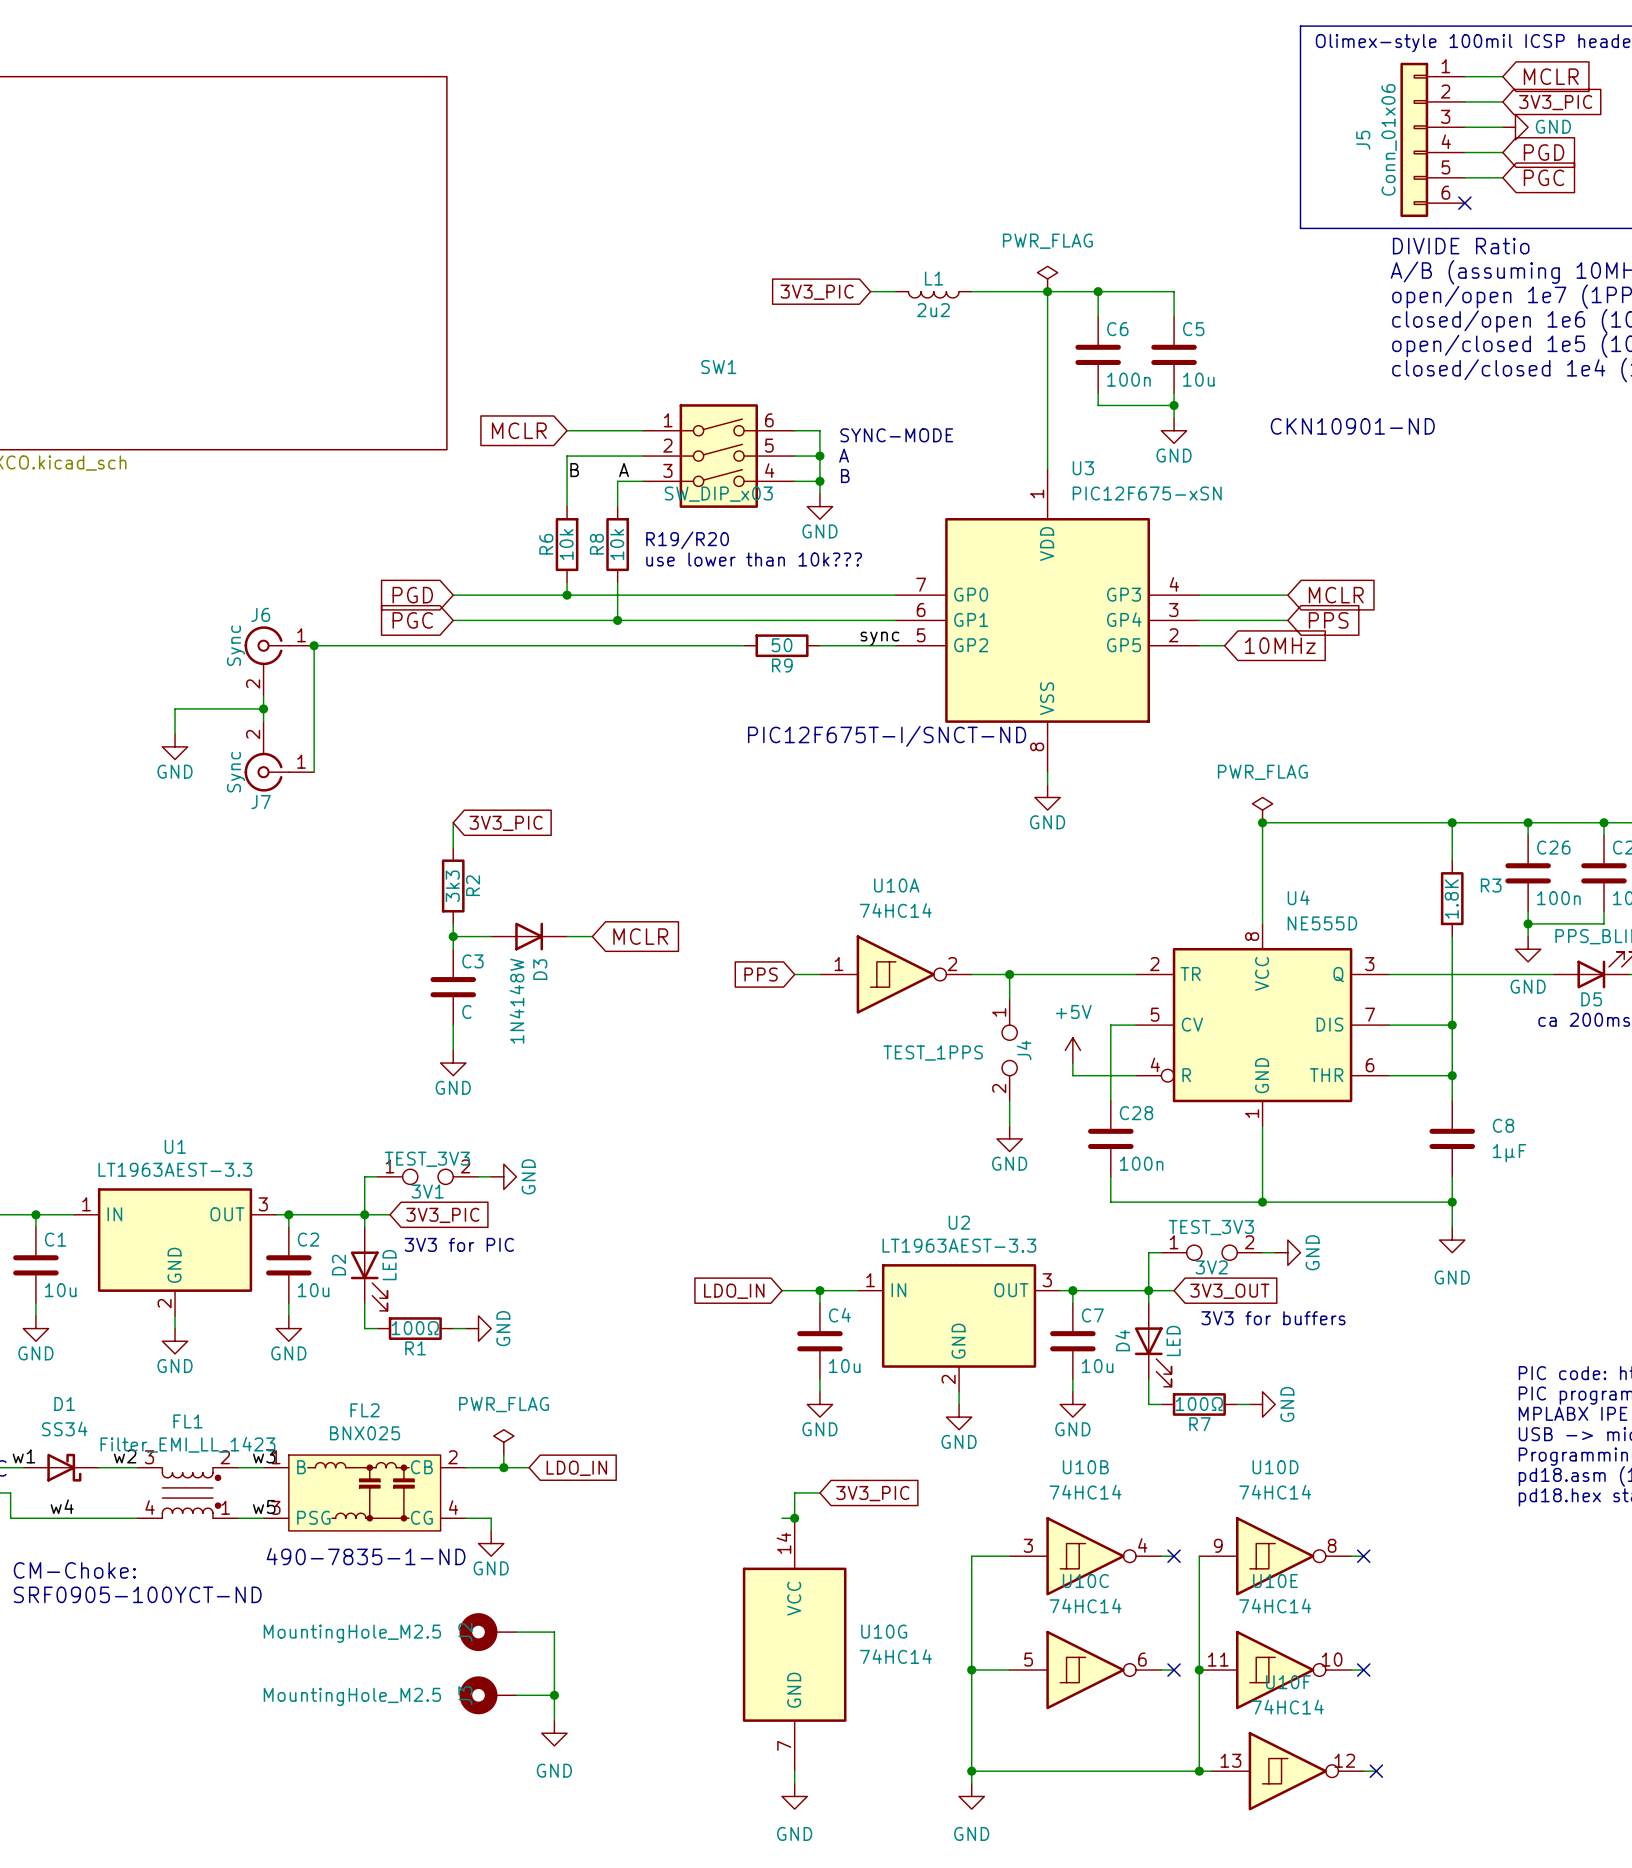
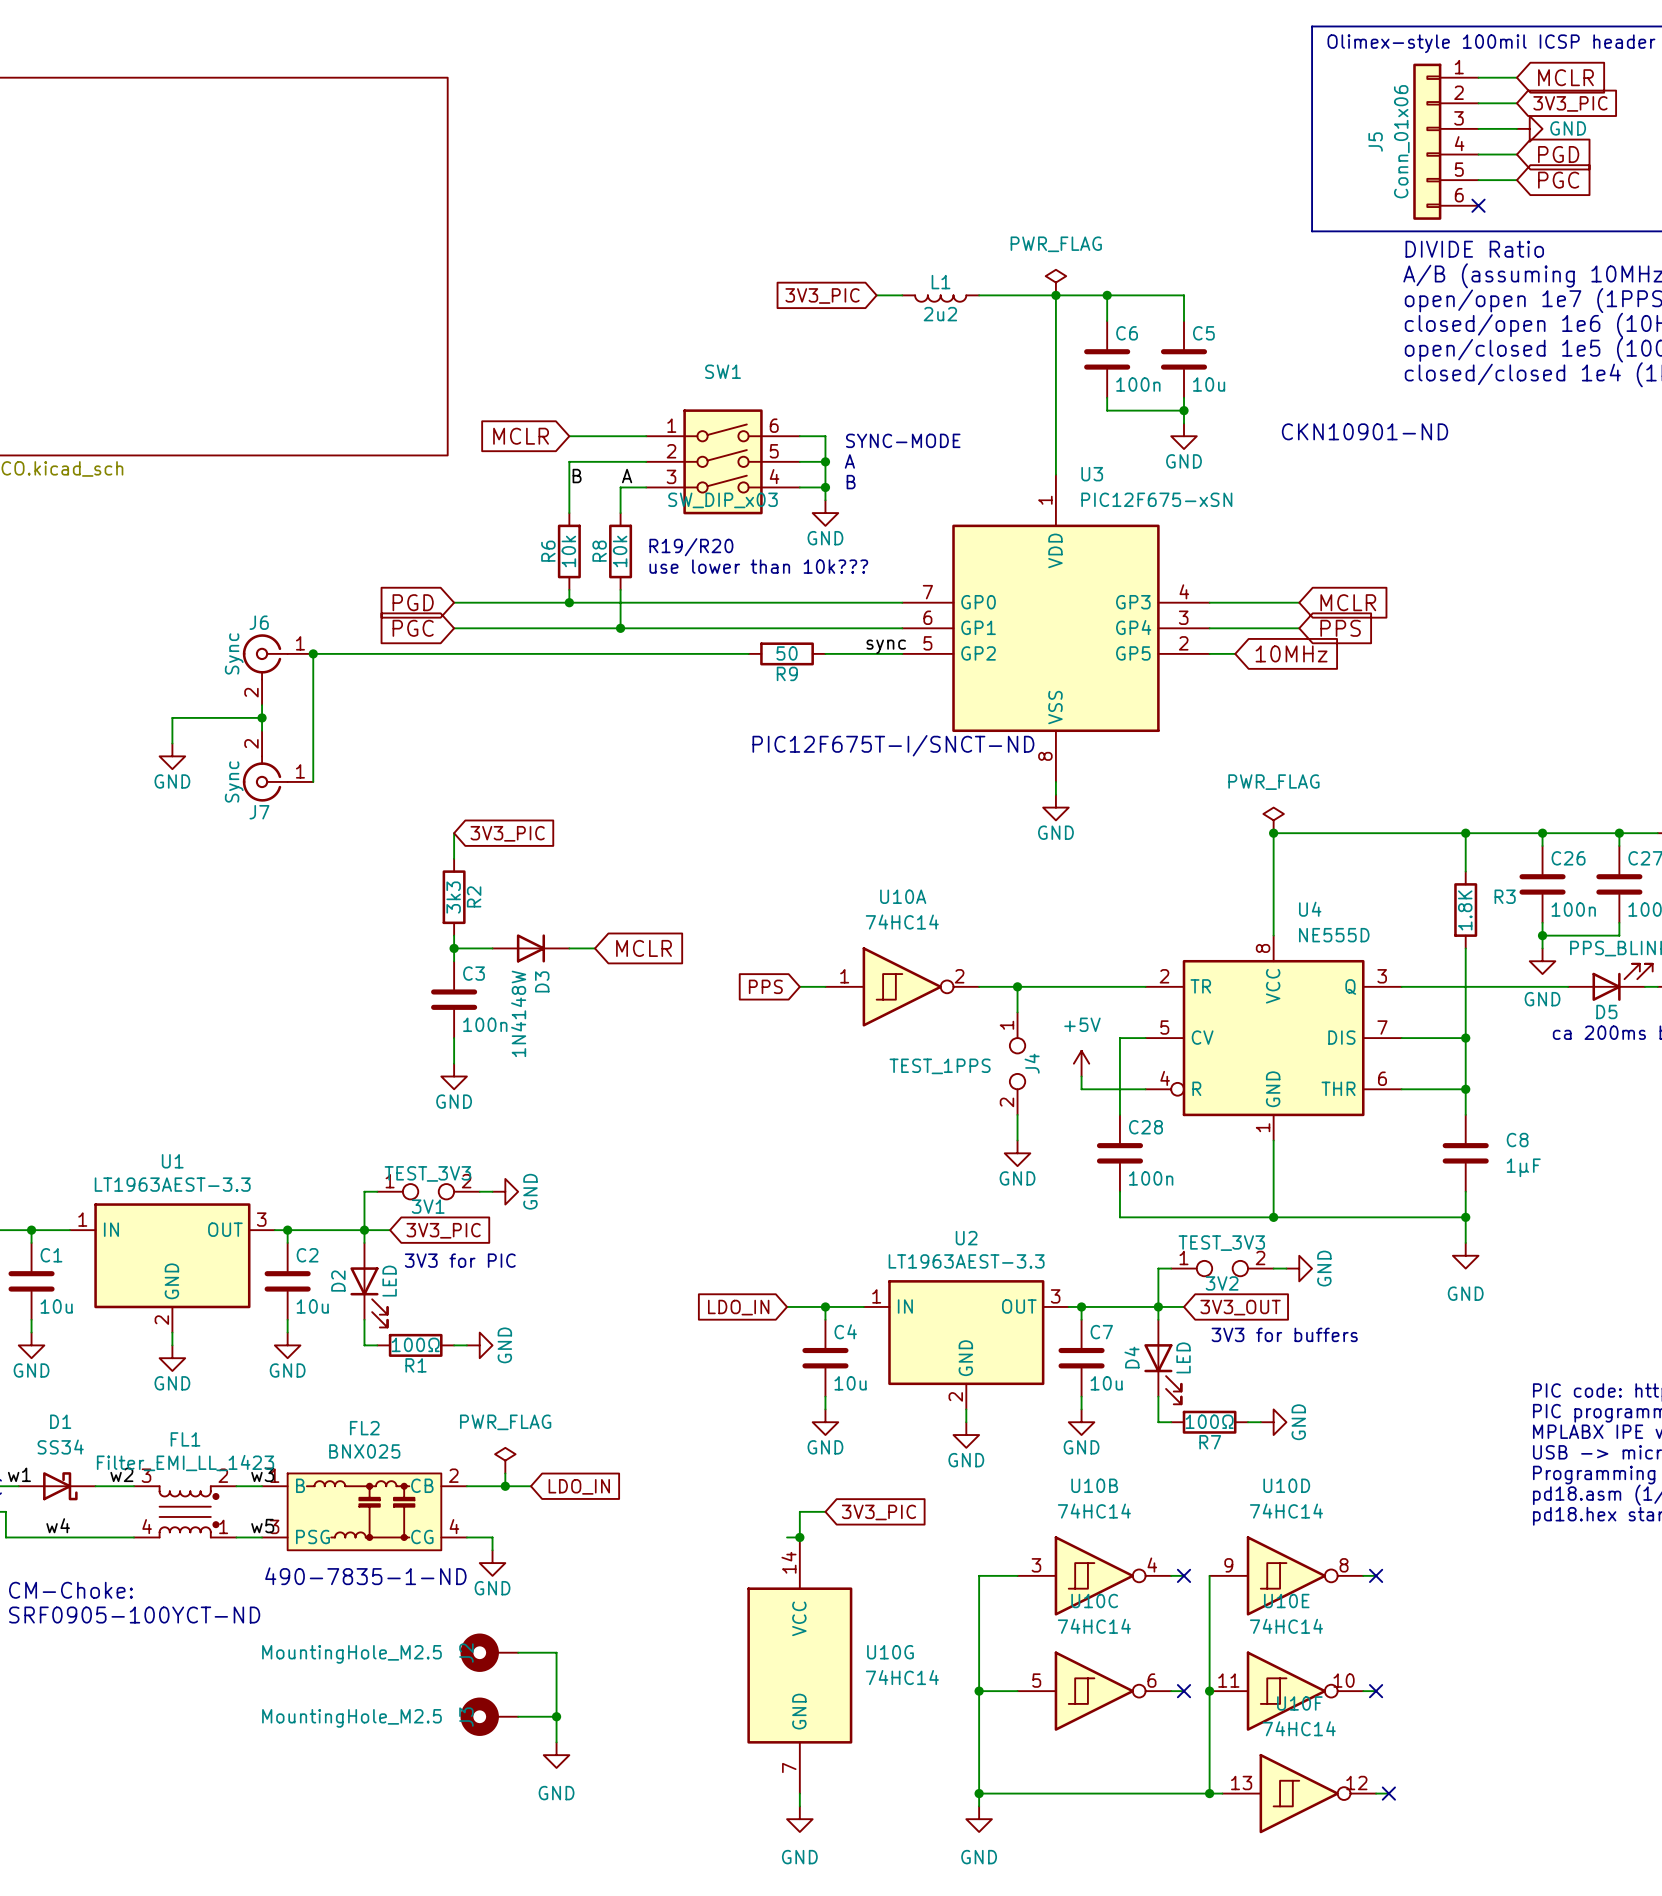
C3 value: C (466, 1011) -> 100n (485, 1024)

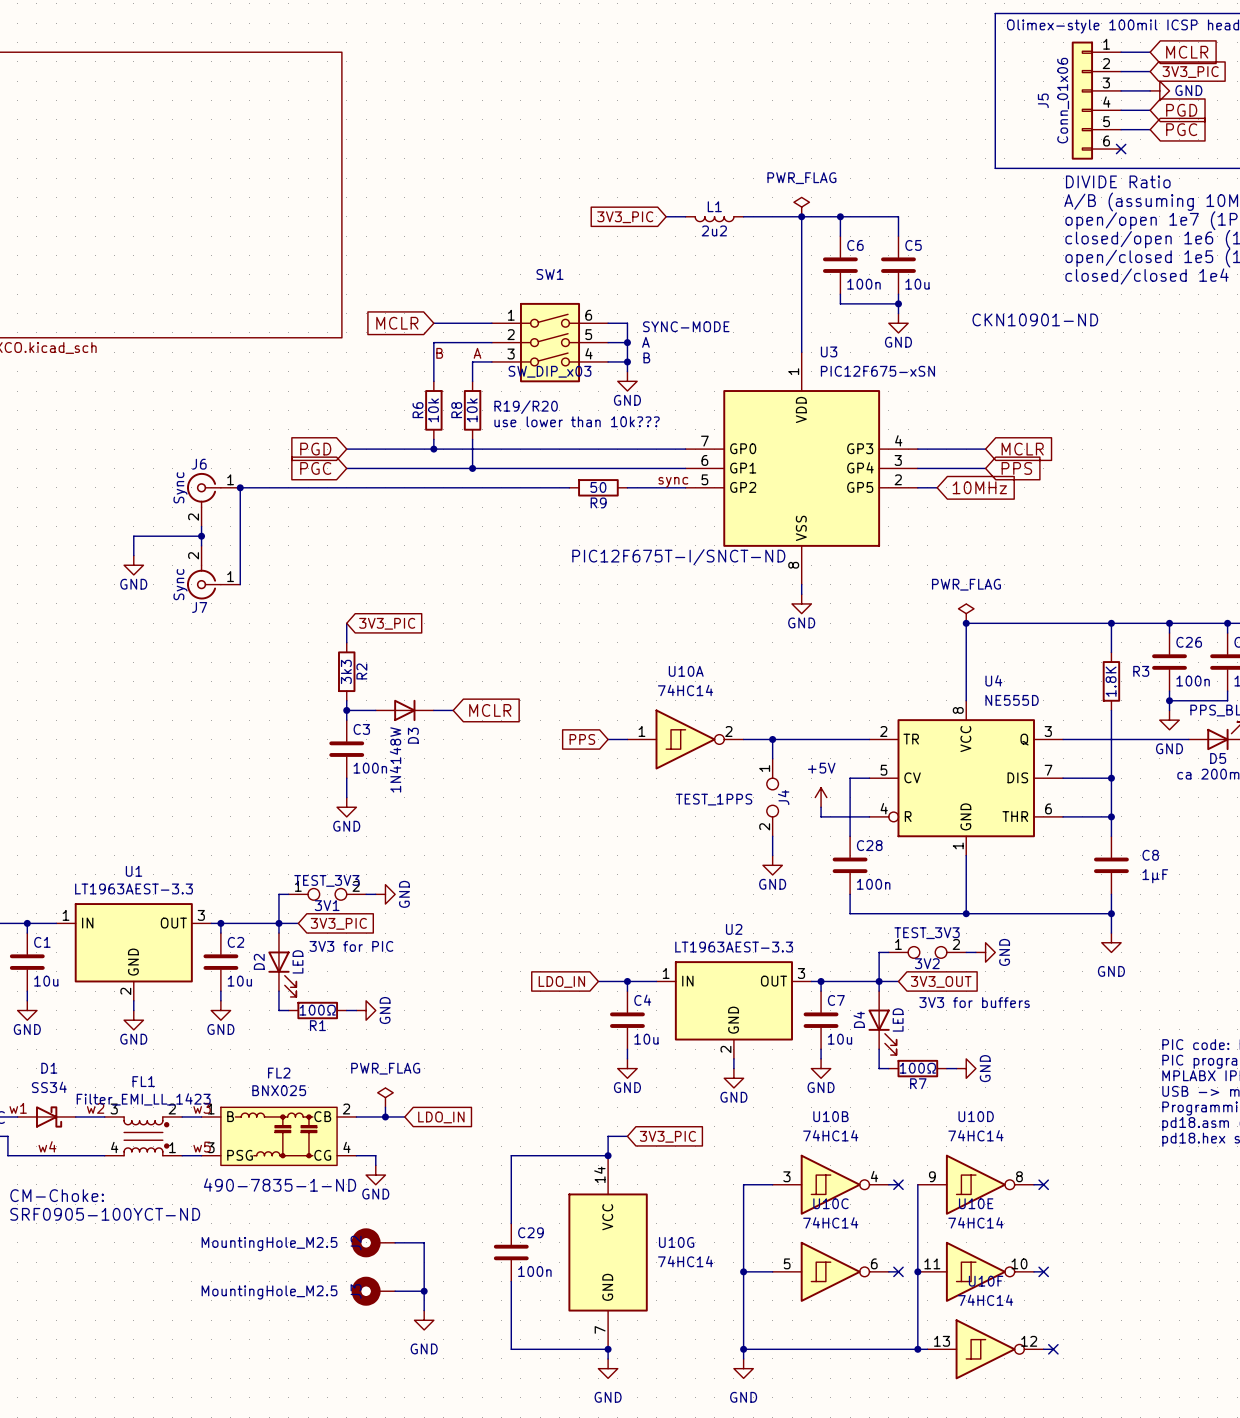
wire: none -> (598, 1155) (511, 1155) (511, 1223)
C29: none -> 100n (511, 1252)
wire: none -> (511, 1281) (511, 1349) (608, 1349)
junction: none -> (608, 1349)

